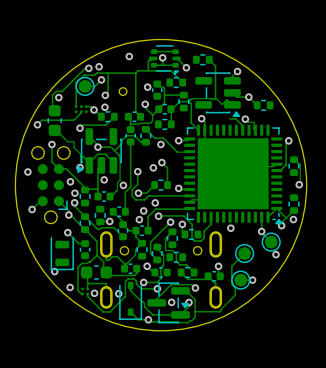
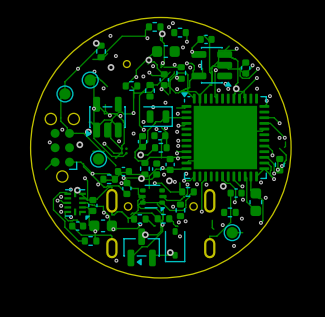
via: none -> (172, 23)
track: none -> (148, 26) (145, 30) (145, 36) (122, 36) (101, 57)
part: none -> (154, 26)
track: none -> (160, 26) (160, 39) (164, 43) (164, 64) (161, 67) (162, 63)
via: none -> (169, 27)
track: (175, 51) (154, 51) -> none
part footprint: [192, 54, 213, 66] -> [197, 34, 215, 45]
via: (129, 56) -> none
part: none -> (180, 32)
track: none -> (185, 32) (186, 41)
track: (153, 58) (148, 60) (148, 70) -> none
track: (176, 58) (186, 67) -> none
via: none -> (110, 35)
part position: (164, 60) -> (152, 198)
via: none -> (147, 38)
track: none -> (200, 39) (192, 47) (192, 51)
track: (175, 65) (154, 65) -> none
via: (99, 66) -> none
via: none -> (186, 41)
via: (186, 67) -> none
track: (88, 68) (85, 68) (62, 91) (56, 91) (52, 95) (52, 108) (54, 110) -> none
via: (237, 71) -> none
track: (108, 73) (108, 92) (105, 95) -> none
track: (135, 73) (96, 73) (94, 75) (83, 75) (76, 82) (76, 106) -> none
track: (135, 73) (135, 112) (140, 116) -> none
track: (135, 73) (138, 70) (170, 70) (182, 82) -> none
via: none -> (182, 47)
via: none -> (236, 48)
part: none -> (101, 51)
track: none -> (157, 51) (154, 51) (136, 70) (136, 77) (125, 85)
part: none -> (165, 51)
via: none -> (192, 51)
via: (101, 79) -> none
via: none -> (115, 56)
part: (176, 82) -> none
track: (157, 84) (164, 88) (164, 103) (152, 114) (145, 107) (145, 104) -> none
part position: (85, 86) -> (98, 159)
track: none -> (245, 62) (240, 68) (240, 76) (242, 78) (249, 78) (257, 68)
part: (157, 90) -> none
via: none -> (162, 63)
track: none -> (186, 63) (194, 65) (193, 77) (189, 80) (189, 87) (180, 91)
via: none -> (186, 63)
track: none -> (147, 64) (154, 61) (161, 72)
via: none -> (174, 64)
via: none -> (153, 66)
via: none -> (199, 65)
track: none -> (252, 65) (245, 73)
via: none -> (252, 65)
track: none -> (228, 66) (212, 66) (209, 69) (212, 75) (211, 85) (209, 85)
via: none -> (190, 67)
via: none -> (78, 68)
track: none -> (202, 68) (202, 77)
via: none -> (257, 68)
via: (58, 97) -> none
via: (248, 97) -> none
track: none -> (215, 70) (215, 96) (216, 98)
via: none -> (215, 70)
part footprint: [253, 99, 274, 111] -> [240, 59, 251, 77]
via: none -> (94, 71)
track: none -> (165, 72) (162, 75) (152, 75) (149, 72)
track: none -> (170, 72) (157, 84) (150, 84) (139, 95) (139, 125) (143, 129)
track: none -> (174, 71) (168, 79) (168, 85) (175, 92) (195, 91) (199, 95)
via: none -> (149, 72)
track: (189, 101) (192, 98) (210, 98) (216, 99) (222, 104) (227, 99) (232, 104) -> none
via: (145, 104) -> none
part footprint: [47, 105, 62, 137] -> [56, 85, 74, 103]
part footprint: [74, 105, 88, 114] -> [81, 71, 99, 89]
via: none -> (143, 76)
via: none -> (136, 77)
via: none -> (176, 77)
via: (104, 107) -> none
track: none -> (256, 78) (239, 95) (239, 98)
via: none -> (256, 78)
track: none -> (90, 80) (93, 83) (93, 138) (111, 156) (123, 156) (126, 153)
via: (94, 109) -> none
part rotation: 0° (164, 109) -> 90° clockwise (164, 79)
track: (81, 111) (73, 120) (42, 120) (37, 124) -> none
part footprint: [124, 111, 145, 123] -> [122, 80, 141, 91]
via: none -> (225, 83)
part: (107, 116) -> none
track: (114, 116) (105, 125) (82, 125) (79, 128) -> none
track: none -> (137, 85) (133, 89) (133, 113) (118, 112) (110, 122) (110, 138) (121, 148)
via: none -> (103, 88)
track: (201, 118) (204, 121) (204, 126) -> (236, 48) (235, 50) (218, 50) (218, 61) (211, 68) (212, 82) (199, 95)
via: (201, 118) -> none
track: (229, 118) (235, 118) (242, 126) -> (228, 55) (237, 61) (237, 82) (233, 95)
track: none -> (161, 89) (168, 94)
via: none -> (161, 89)
via: none -> (177, 89)
via: none -> (228, 88)
via: none -> (257, 88)
via: none -> (218, 90)
part: none -> (150, 90)
via: (37, 124) -> none
part: (164, 124) -> none
via: none -> (269, 96)
via: (79, 128) -> none
track: (145, 129) (154, 138) (163, 138) (177, 152) (189, 151) -> (142, 147) (147, 141) (147, 130) (155, 121) (160, 121) (165, 116) (186, 117)
track: (54, 130) (67, 141) (74, 141) (74, 147) (80, 154) (80, 167) -> none
track: none -> (266, 100) (264, 106)
via: none -> (266, 100)
via: none -> (165, 102)
part: (130, 135) -> none
part: (145, 135) -> none
track: none -> (105, 104) (105, 110) (109, 115)
via: none -> (153, 107)
via: (178, 140) -> none
track: (288, 140) (286, 143) (286, 164) (280, 170) (276, 170) -> none
via: (288, 140) -> none
via: none -> (93, 108)
track: (130, 141) (130, 186) (125, 192) (125, 211) -> none
track: (145, 142) (141, 142) (134, 135) (126, 135) (114, 150) -> none
track: (51, 144) (51, 162) (56, 166) -> (101, 45) (64, 81) (64, 93) (60, 98) (60, 121) (67, 127) (67, 131)
via: (51, 144) -> none
via: (160, 144) -> none
via: none -> (133, 113)
via: (97, 147) -> none
via: none -> (177, 113)
via: none -> (109, 115)
via: none -> (120, 115)
part: none -> (158, 116)
track: none -> (264, 117) (274, 117) (279, 123)
via: none -> (143, 121)
track: none -> (186, 123) (184, 125) (178, 125)
track: none -> (264, 123) (270, 123) (284, 137)
via: none -> (279, 123)
track: (293, 159) (300, 165) (300, 178) -> none
via: none -> (178, 125)
via: (161, 162) -> none
via: none -> (166, 128)
via: none -> (62, 129)
via: none -> (156, 129)
track: (101, 165) (97, 168) (97, 196) -> none
via: none -> (143, 129)
part: (293, 166) -> none
via: (153, 167) -> none
via: none -> (177, 131)
track: (66, 169) (85, 187) (85, 190) -> (76, 133) (83, 133) (115, 166)
via: none -> (133, 133)
via: (137, 171) -> none
part: none -> (159, 135)
track: none -> (165, 135) (161, 139) (161, 157)
via: (27, 172) -> none
via: none -> (284, 137)
part rotation: 0° (233, 174) -> 180° (225, 136)
via: none -> (279, 137)
via: none -> (119, 141)
via: none -> (178, 140)
part: none -> (142, 141)
via: none -> (49, 142)
via: (104, 179) -> none
track: none -> (104, 143) (113, 153) (121, 153)
via: none -> (104, 143)
via: none -> (178, 145)
track: none -> (264, 146) (267, 146) (272, 151) (272, 155)
via: (299, 184) -> none
via: (123, 185) -> none
track: none -> (279, 148) (286, 155) (284, 163)
part: none -> (124, 150)
via: (178, 188) -> none
via: none -> (176, 153)
via: (74, 193) -> none
via: none -> (272, 155)
track: none -> (264, 157) (267, 157) (274, 164) (274, 173)
part: (85, 196) -> none
part: (104, 196) -> none
via: none -> (177, 158)
track: none -> (279, 159) (277, 169)
track: (58, 201) (68, 211) (68, 215) (97, 241) (97, 255) (90, 262) (81, 263) (77, 267) (77, 290) (82, 294) -> (69, 162) (80, 162) (92, 173) (109, 173) (114, 179) (121, 172) (144, 174)
via: (74, 202) -> none
via: (155, 202) -> none
track: none -> (264, 163) (271, 166) (270, 175) (274, 179)
part: none -> (170, 164)
via: none -> (281, 166)
via: none -> (162, 167)
part: none -> (144, 168)
part: none -> (156, 168)
via: (32, 209) -> none
via: none -> (277, 169)
via: (143, 210) -> none
track: (293, 210) (281, 222) (281, 225) -> none
via: none -> (274, 173)
via: none -> (92, 173)
track: none -> (156, 174) (151, 179) (123, 177)
via: none -> (186, 173)
via: (68, 215) -> none
part rotation: 0° (100, 215) -> 90° clockwise (109, 179)
via: none -> (164, 174)
track: (158, 216) (183, 215) (192, 224) (192, 238) (194, 240) (201, 240) (204, 238) (204, 231) (211, 224) (211, 220) -> (201, 211) (201, 182) (205, 179)
via: (158, 216) -> none
track: none -> (194, 176) (190, 180) (184, 180)
track: none -> (222, 176) (226, 183) (229, 183) (235, 189) (234, 202)
track: none -> (233, 176) (233, 179) (242, 186)
track: none -> (245, 176) (246, 201) (255, 210)
via: none -> (123, 177)
track: none -> (84, 178) (87, 180) (87, 198) (82, 198)
via: none -> (84, 178)
via: (293, 219) -> none
via: none -> (274, 179)
via: (109, 221) -> none
track: (170, 222) (150, 242) (150, 253) (157, 259) -> none
via: none -> (184, 180)
part: (85, 223) -> none
via: none -> (174, 181)
via: none -> (261, 182)
via: none -> (121, 183)
track: none -> (154, 183) (161, 183) (170, 191) (181, 191)
via: none -> (154, 183)
via: (182, 224) -> none
via: (281, 225) -> none
via: none -> (98, 184)
track: none -> (187, 184) (187, 193) (180, 200) (166, 200) (162, 196)
via: none -> (187, 184)
via: none -> (196, 184)
via: none -> (206, 184)
via: none -> (242, 186)
part: (142, 230) -> none
via: none -> (70, 189)
track: (172, 231) (165, 238) (165, 250) (172, 250) (176, 254) (176, 261) (179, 264) (186, 264) (194, 272) -> none
via: (261, 231) -> none
part footprint: [261, 232, 281, 252] -> [249, 188, 263, 217]
track: none -> (192, 191) (185, 200) (185, 207) (183, 210) (169, 210) (162, 202) (142, 202)
part: none -> (236, 193)
part footprint: [50, 236, 74, 271] -> [64, 189, 90, 220]
track: none -> (67, 193) (60, 192) (53, 199) (53, 209) (64, 221) (64, 227) (78, 240) (84, 240)
track: none -> (255, 193) (262, 200) (262, 220) (260, 222)
part: (172, 238) -> none
track: none -> (141, 196) (137, 200) (137, 205) (140, 208) (156, 208) (162, 214) (162, 231) (147, 246) (142, 246) (130, 257)
via: none -> (61, 196)
via: none -> (265, 197)
track: none -> (97, 199) (108, 187) (111, 187) (111, 200)
part footprint: [234, 243, 255, 264] -> [221, 207, 239, 218]
via: none -> (242, 199)
track: none -> (57, 200) (67, 202)
via: none -> (57, 200)
track: none -> (82, 202) (103, 206) (103, 212)
via: none -> (234, 202)
part: (142, 249) -> none
via: none -> (61, 205)
track: none -> (82, 207) (89, 209) (89, 225) (95, 231)
via: none -> (173, 206)
part: (157, 253) -> none
track: (244, 253) (231, 266) (231, 284) (235, 287) (235, 295) (220, 311) (195, 311) -> none
via: (275, 254) -> none
part: none -> (180, 210)
via: none -> (61, 211)
track: none -> (65, 211) (65, 217) (68, 220) (77, 220) (83, 226)
via: none -> (201, 211)
via: none -> (103, 212)
part: (176, 257) -> none
track: none -> (130, 214) (152, 213) (157, 218)
via: none -> (71, 217)
via: none -> (107, 216)
part: none -> (139, 219)
part: none -> (163, 218)
track: none -> (169, 218) (178, 226)
via: none -> (241, 218)
via: (147, 266) -> none
via: (218, 266) -> none
via: none -> (185, 221)
part: (130, 268) -> none
via: none -> (178, 222)
via: none -> (260, 222)
via: none -> (140, 224)
via: (54, 271) -> none
via: none -> (162, 224)
via: none -> (222, 225)
part: none -> (77, 226)
part: (161, 272) -> none
track: (181, 272) (188, 279) (205, 279) (208, 276) (215, 284) -> (230, 193) (230, 222) (216, 236) (209, 236)
part: (187, 272) -> none
via: none -> (113, 229)
part: (214, 276) -> none
via: none -> (95, 231)
via: (252, 280) -> none
part footprint: [119, 281, 143, 320] -> [123, 228, 160, 267]
track: (87, 283) (106, 284) -> (72, 226) (81, 235) (111, 236)
via: none -> (179, 236)
track: (130, 285) (130, 290) (144, 303) (144, 306) (152, 314) (180, 314) (189, 306) (189, 302) -> none
via: (70, 287) -> none
part footprint: [81, 287, 90, 296] -> [81, 235, 100, 246]
track: (195, 287) (192, 284) (171, 284) (156, 299) (156, 302) -> none
via: (195, 287) -> none
track: (157, 288) (141, 288) (134, 278) (127, 278) (125, 281) (125, 296) (109, 311) (103, 311) (87, 296) (87, 294) -> none
via: (157, 288) -> none
track: (180, 290) (186, 290) (195, 299) (195, 317) (187, 323) (138, 319) (130, 312) -> none
via: (94, 293) -> none
via: (118, 293) -> none
part: none -> (175, 245)
via: none -> (234, 245)
part: (168, 302) -> none
via: (189, 302) -> none
track: none -> (175, 255) (155, 255) (152, 257)
via: none -> (116, 260)
via: (148, 319) -> none

